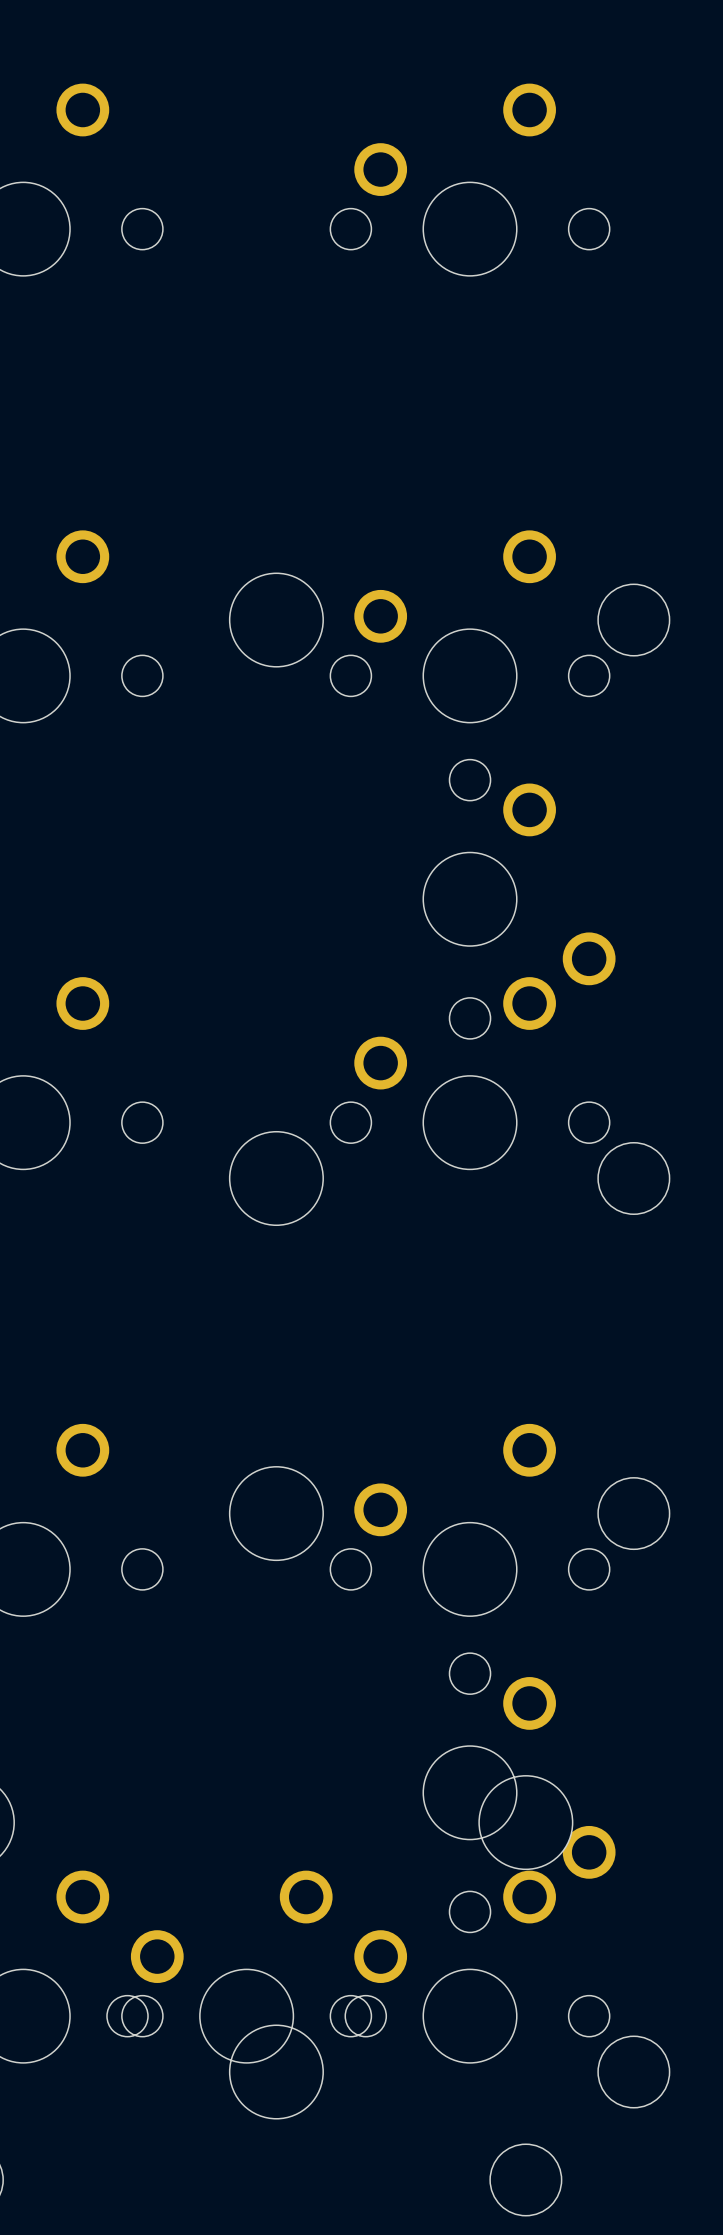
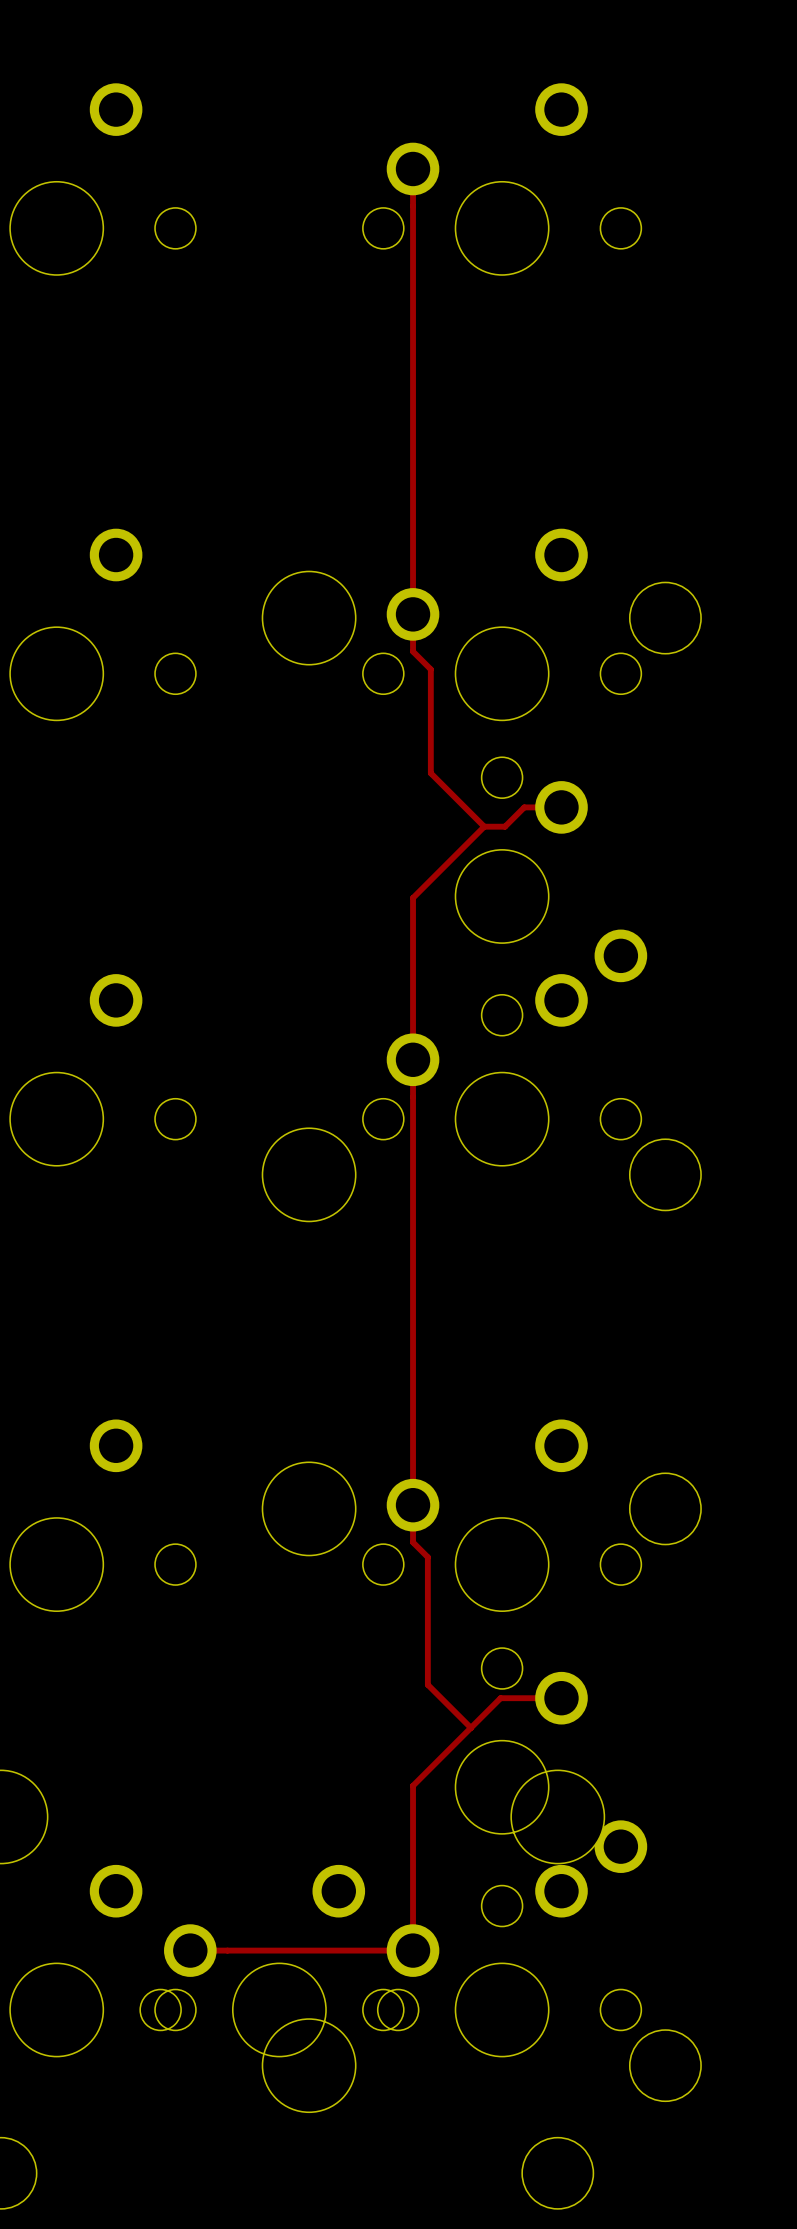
track: none -> (413, 168) (413, 651) (430, 669) (430, 773) (484, 826)
track: none -> (561, 807) (524, 807) (504, 826) (484, 826)
track: none -> (484, 826) (413, 897) (413, 1542) (427, 1557) (427, 1684) (470, 1727)
track: none -> (561, 1698) (500, 1698) (413, 1785) (413, 1950) (190, 1950)

